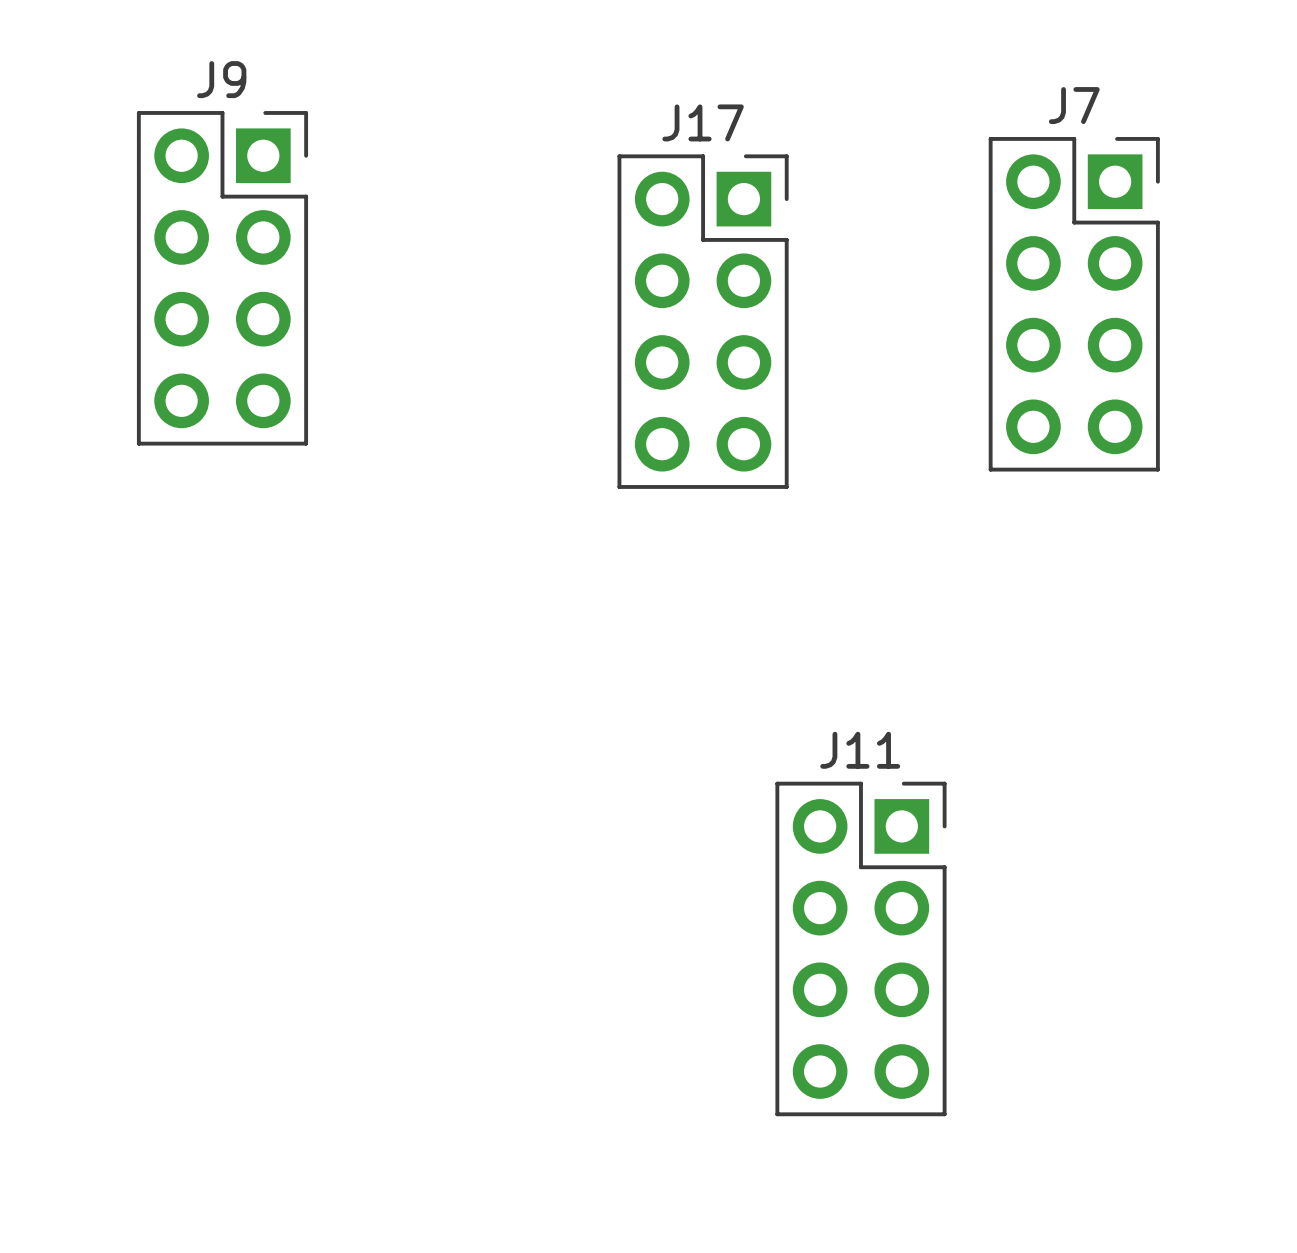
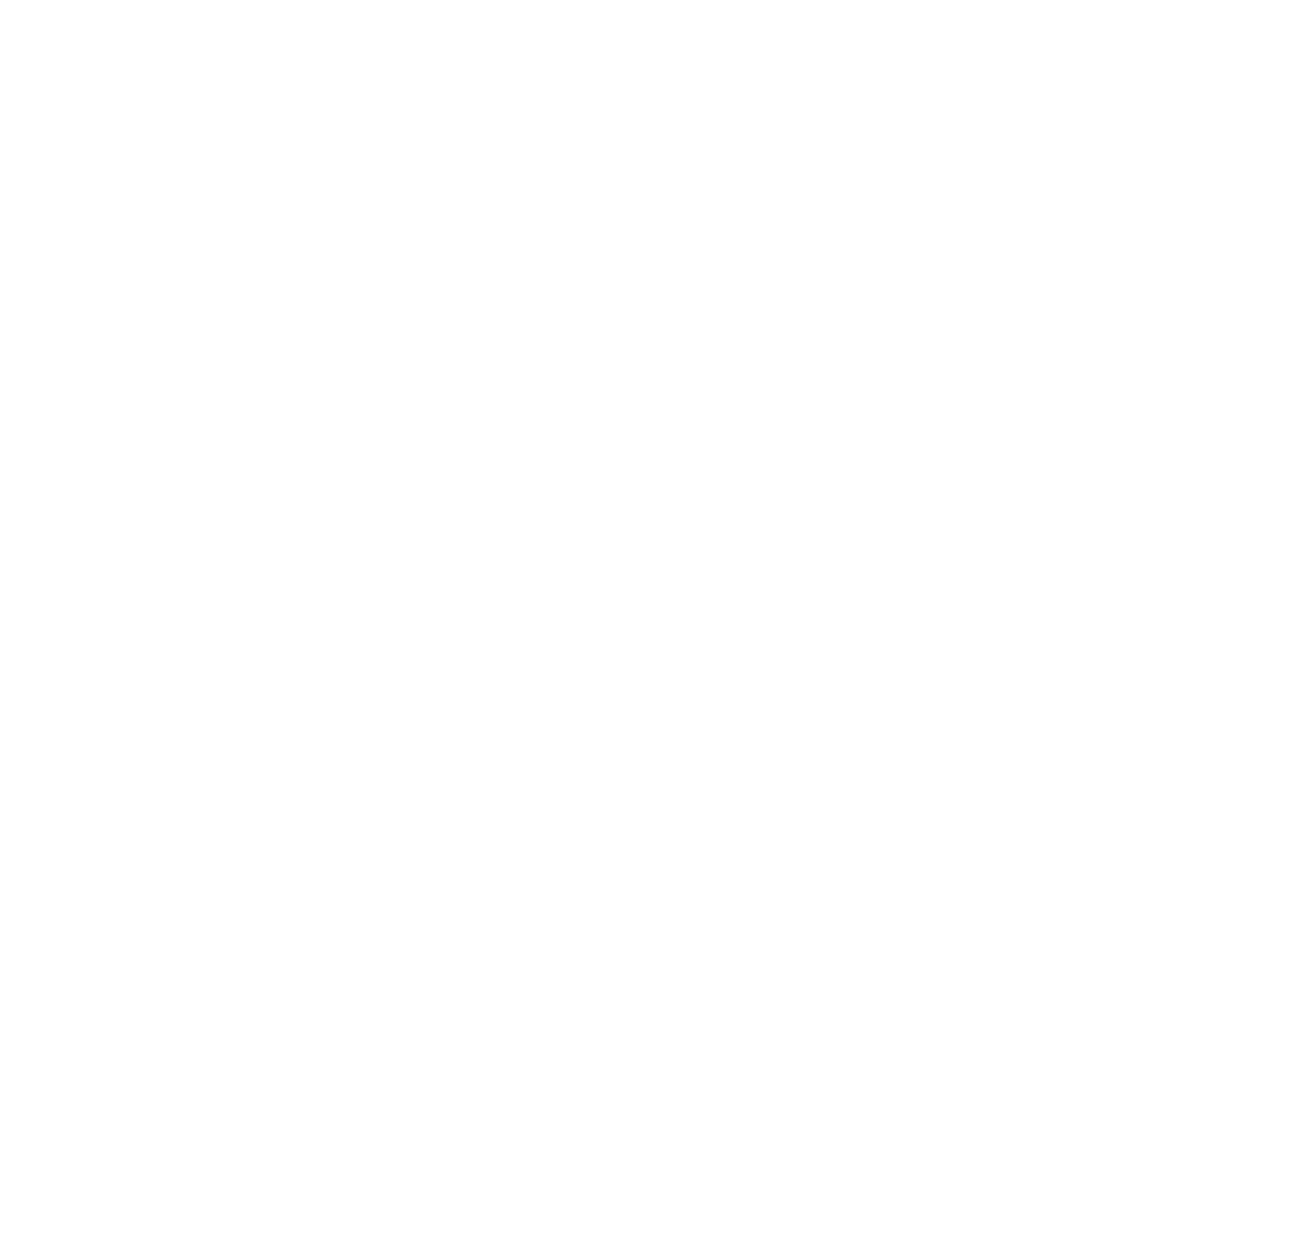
J9: (222, 278) -> none
J7: (1074, 304) -> none
J17: (703, 321) -> none
J11: (860, 948) -> none

